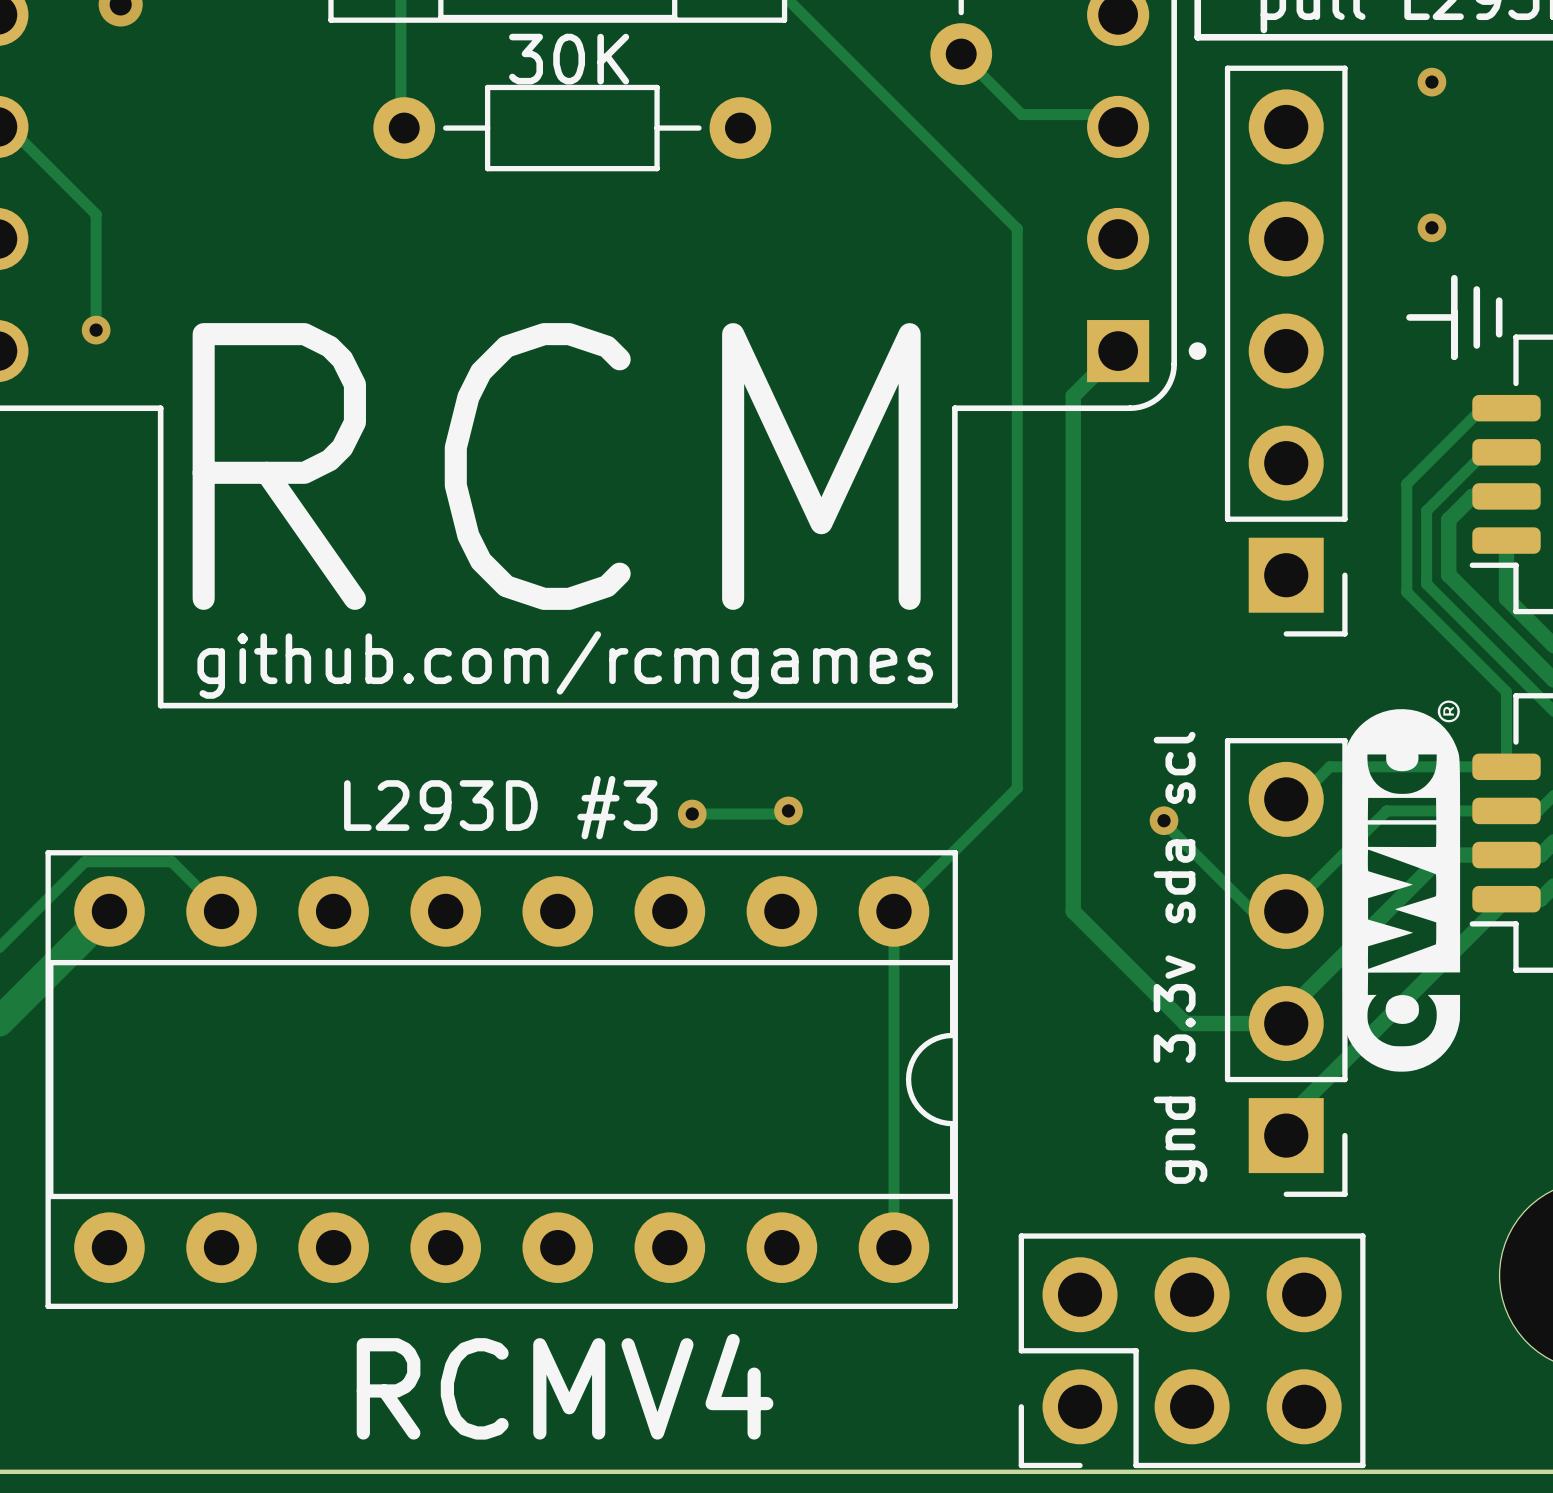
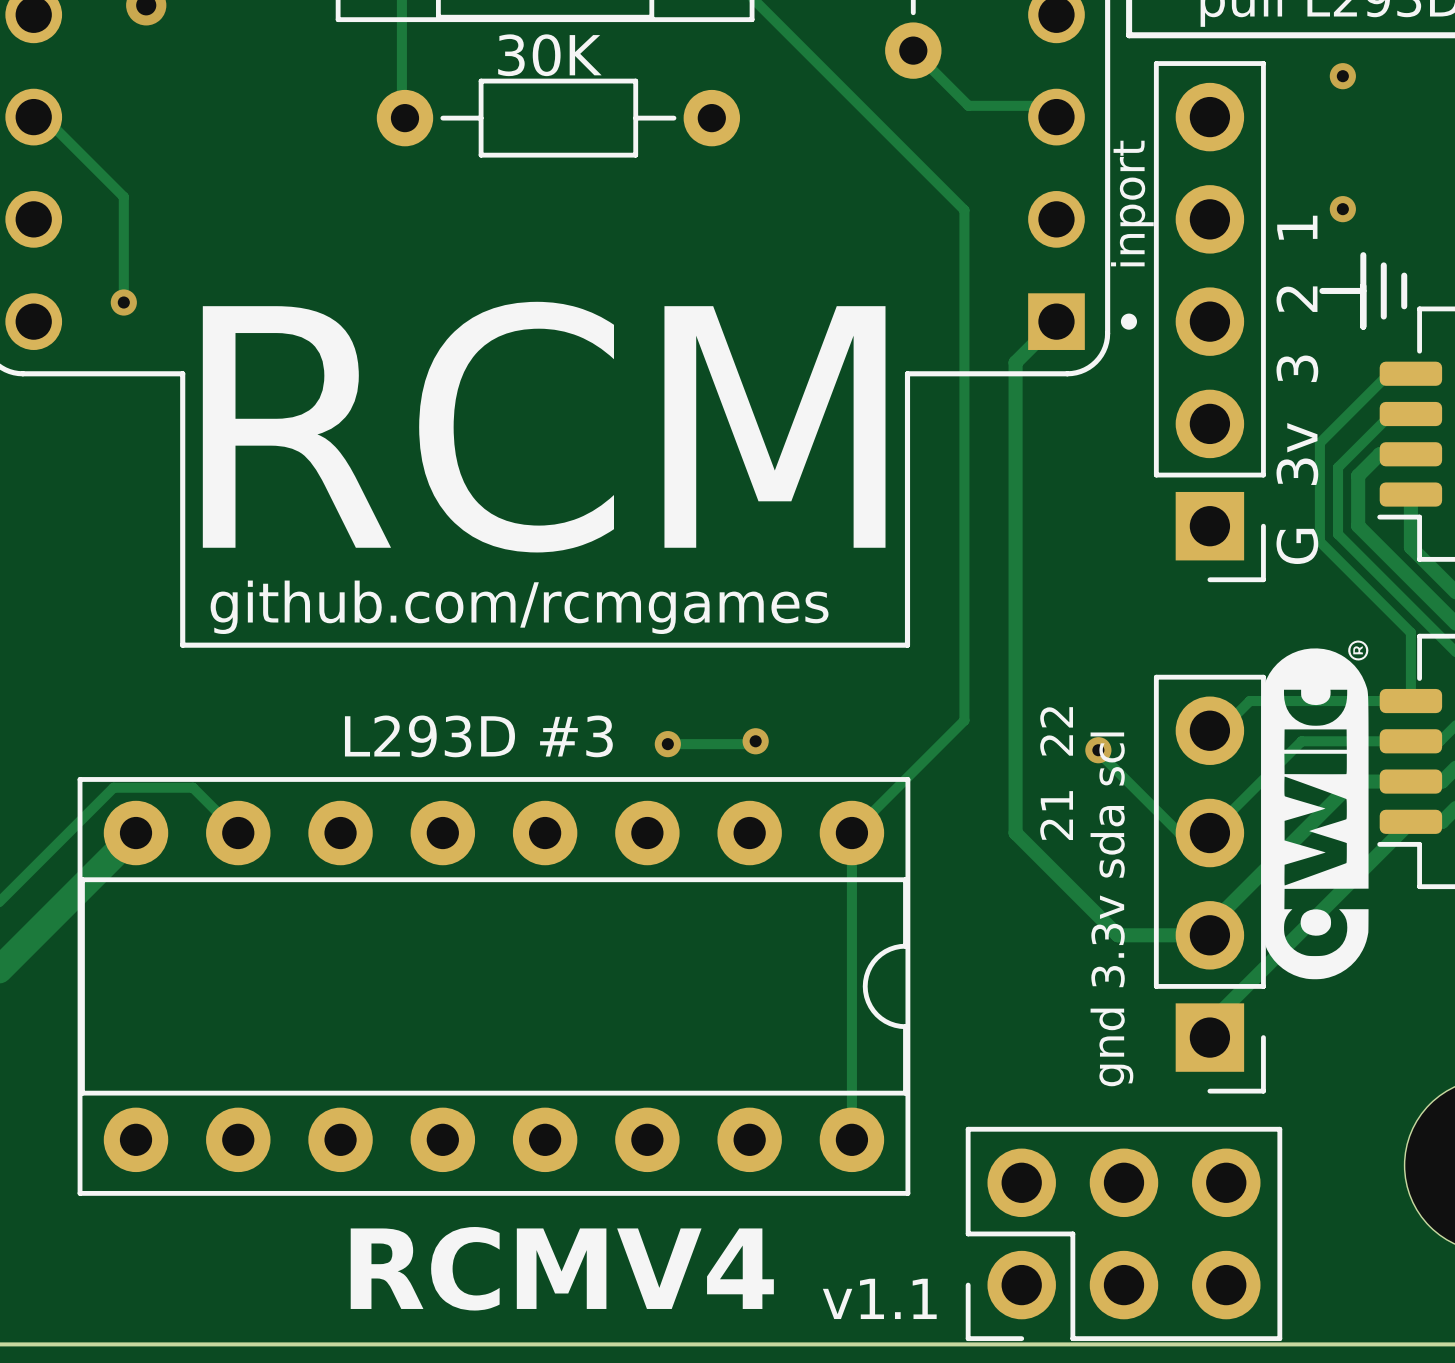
text: none -> inport (1132, 203)
text: none -> G 3v 3 2 1 (1297, 389)
text: none -> 21 22 (1056, 773)
text: none -> v1.1 (879, 1298)

